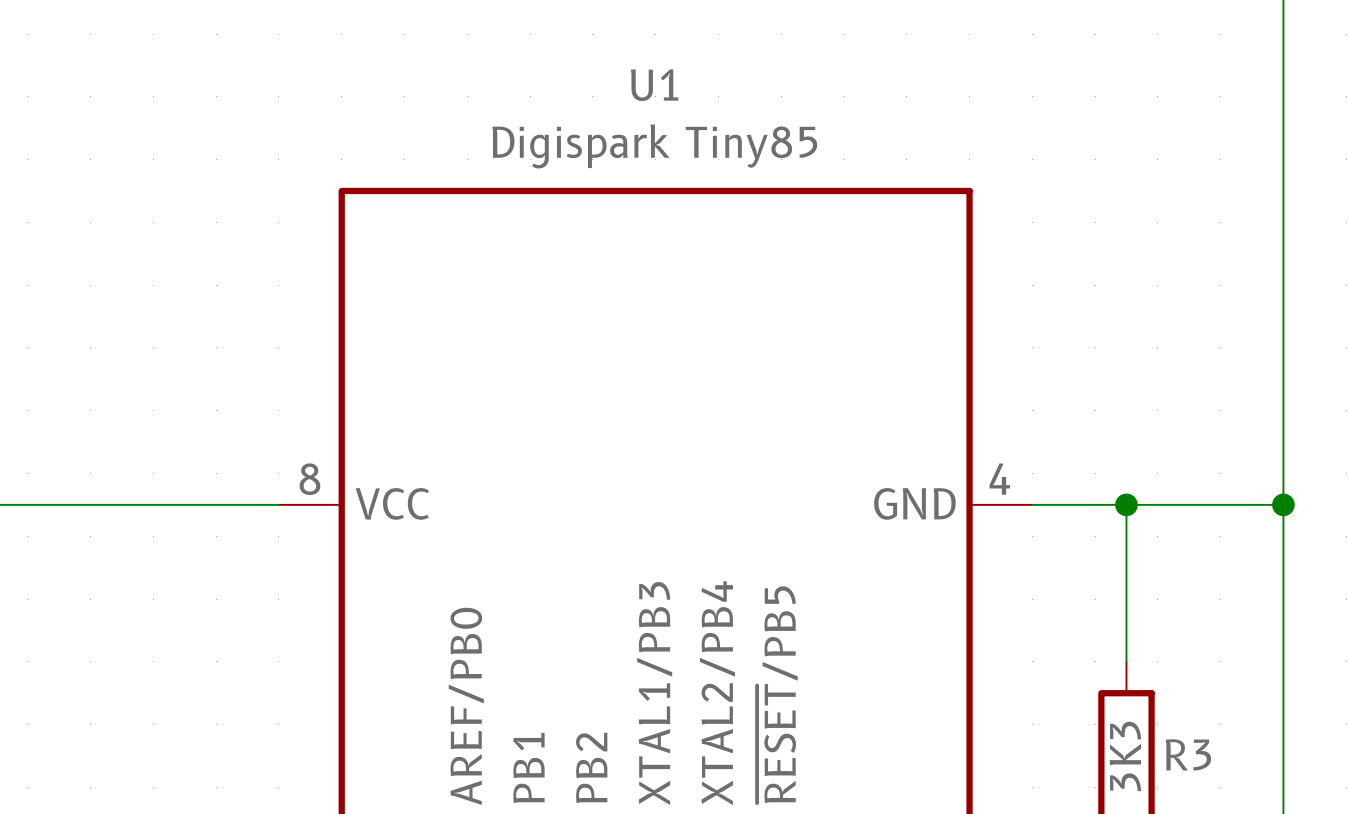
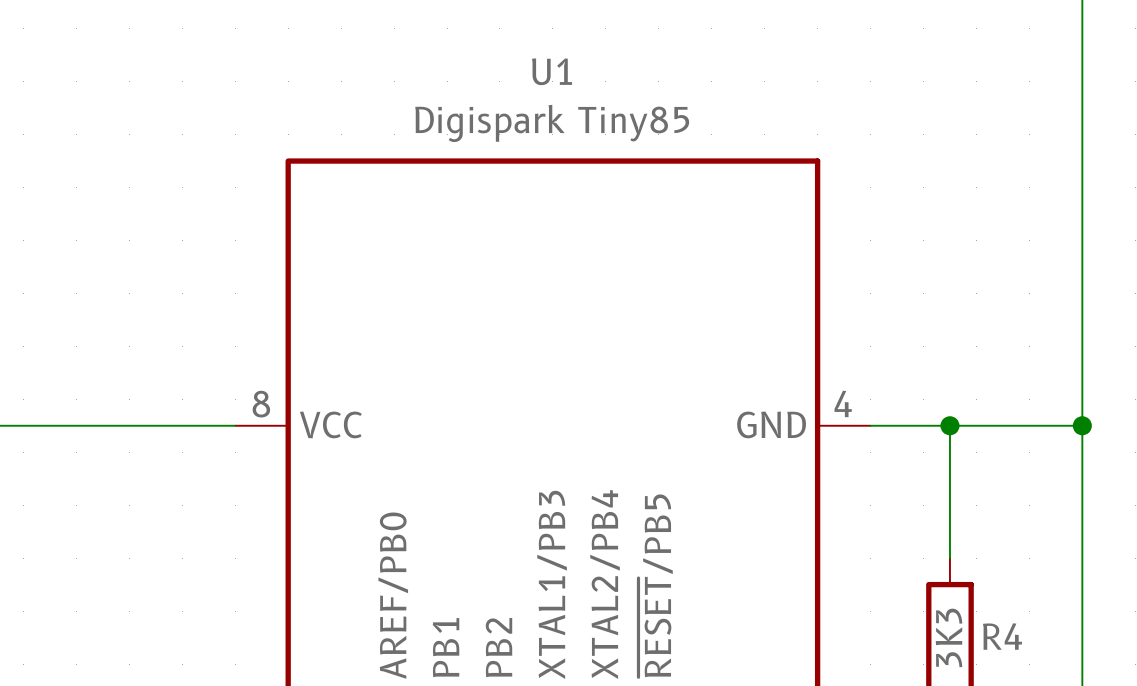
R3 name: R3 (1188, 754) -> R4 (1002, 636)

